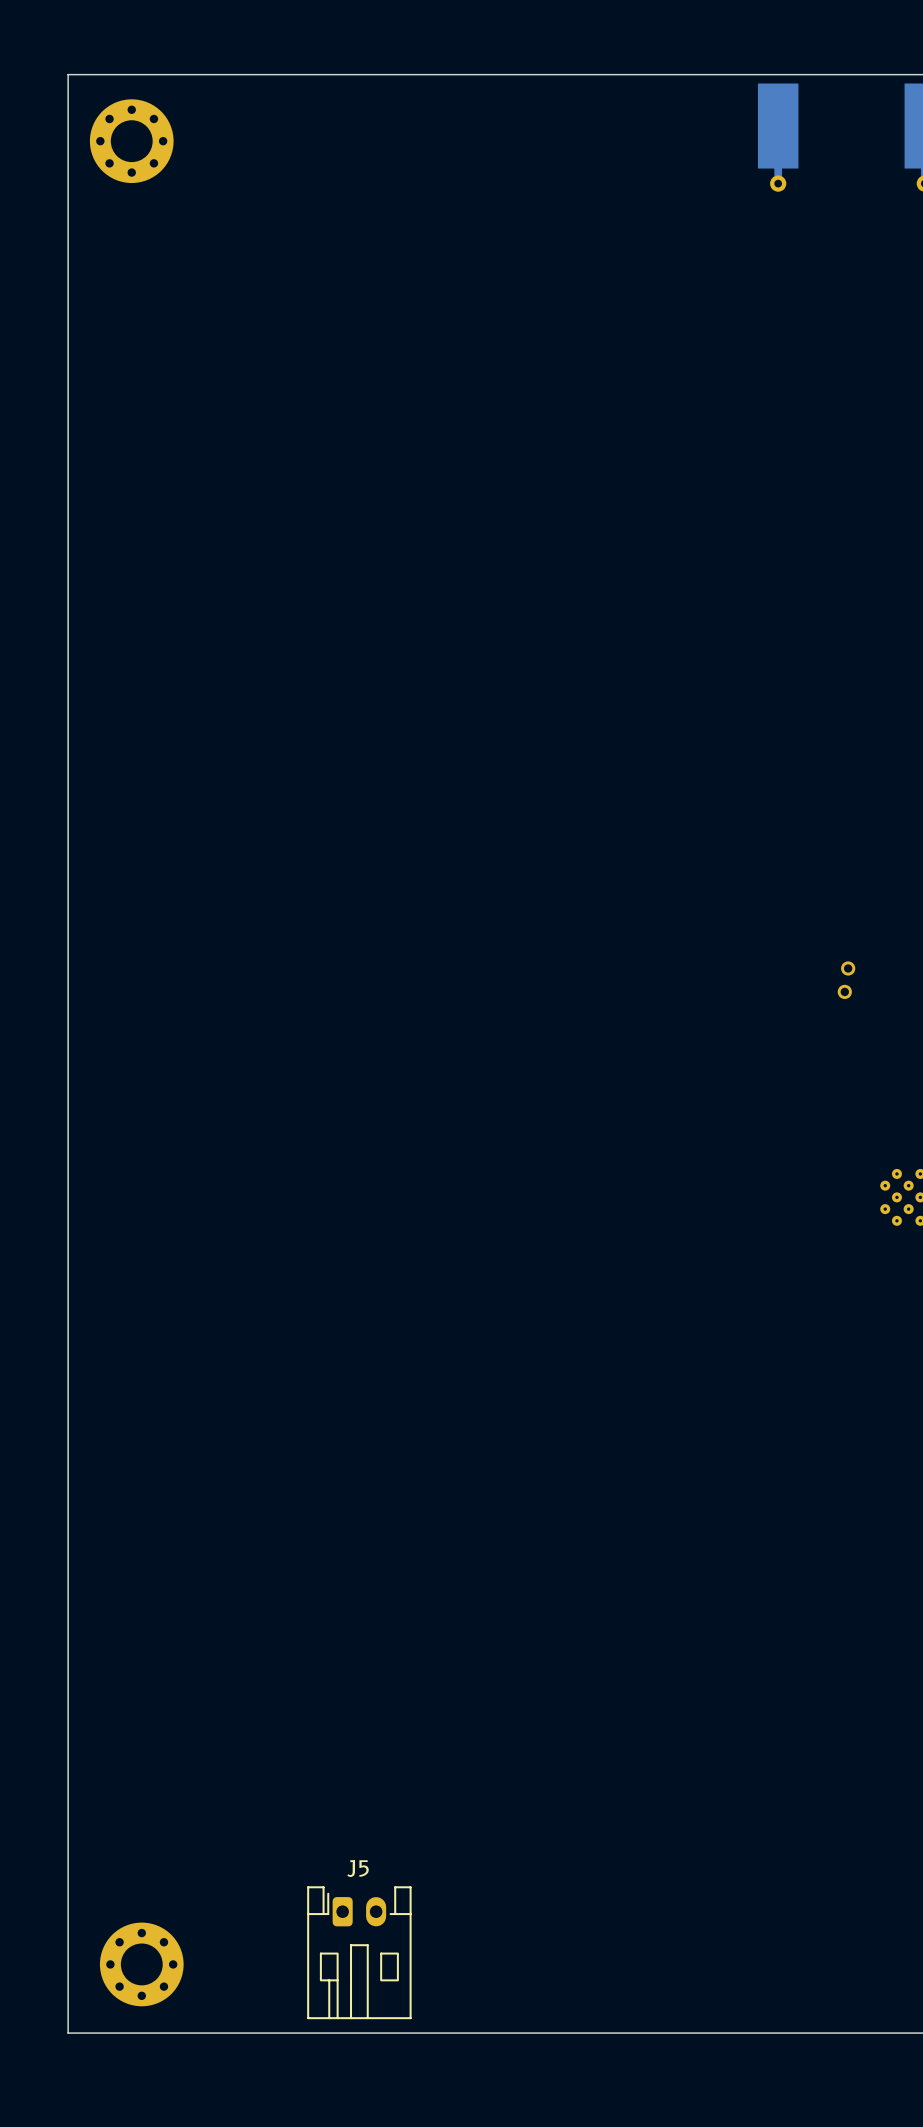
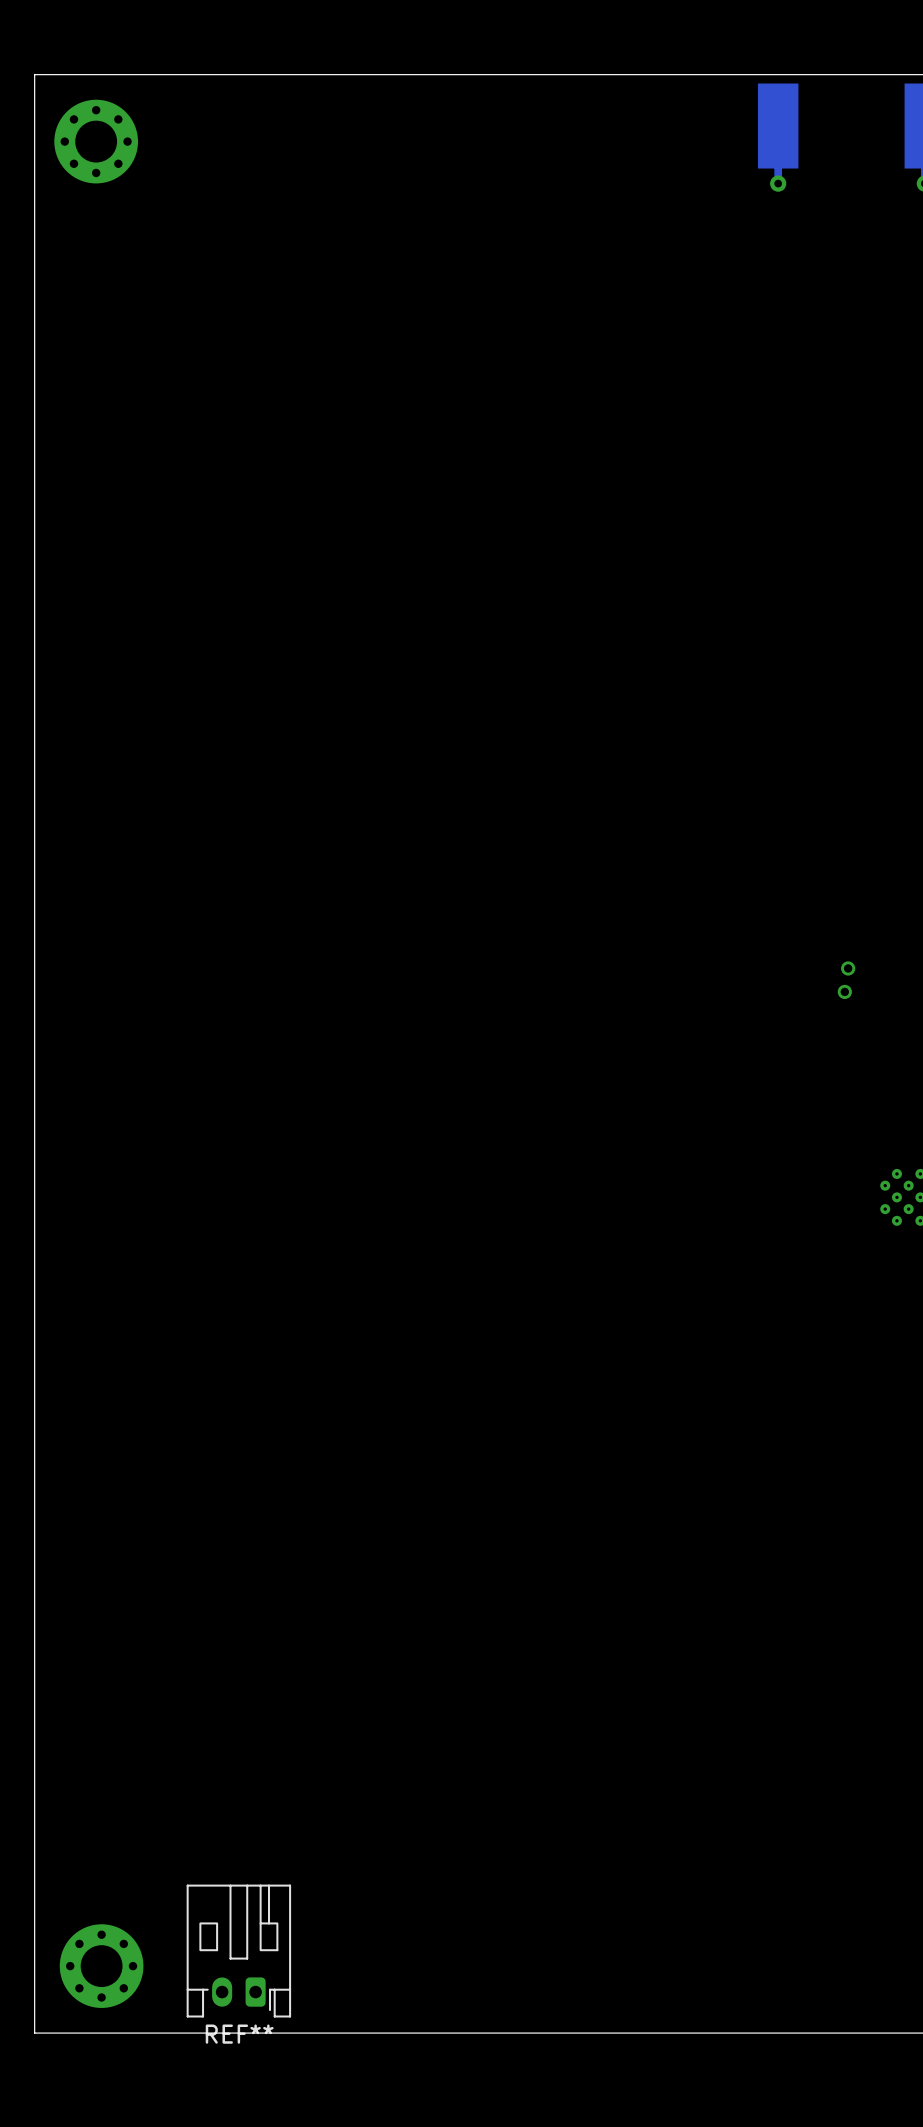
board edge: (68, 74) (68, 2033) -> (68, 74) (34, 74) (34, 2033) (68, 2033)
part position: (131, 141) -> (96, 141)
REF**: none -> (238, 1951)
J5: (359, 1952) -> none
part position: (141, 1964) -> (101, 1966)

